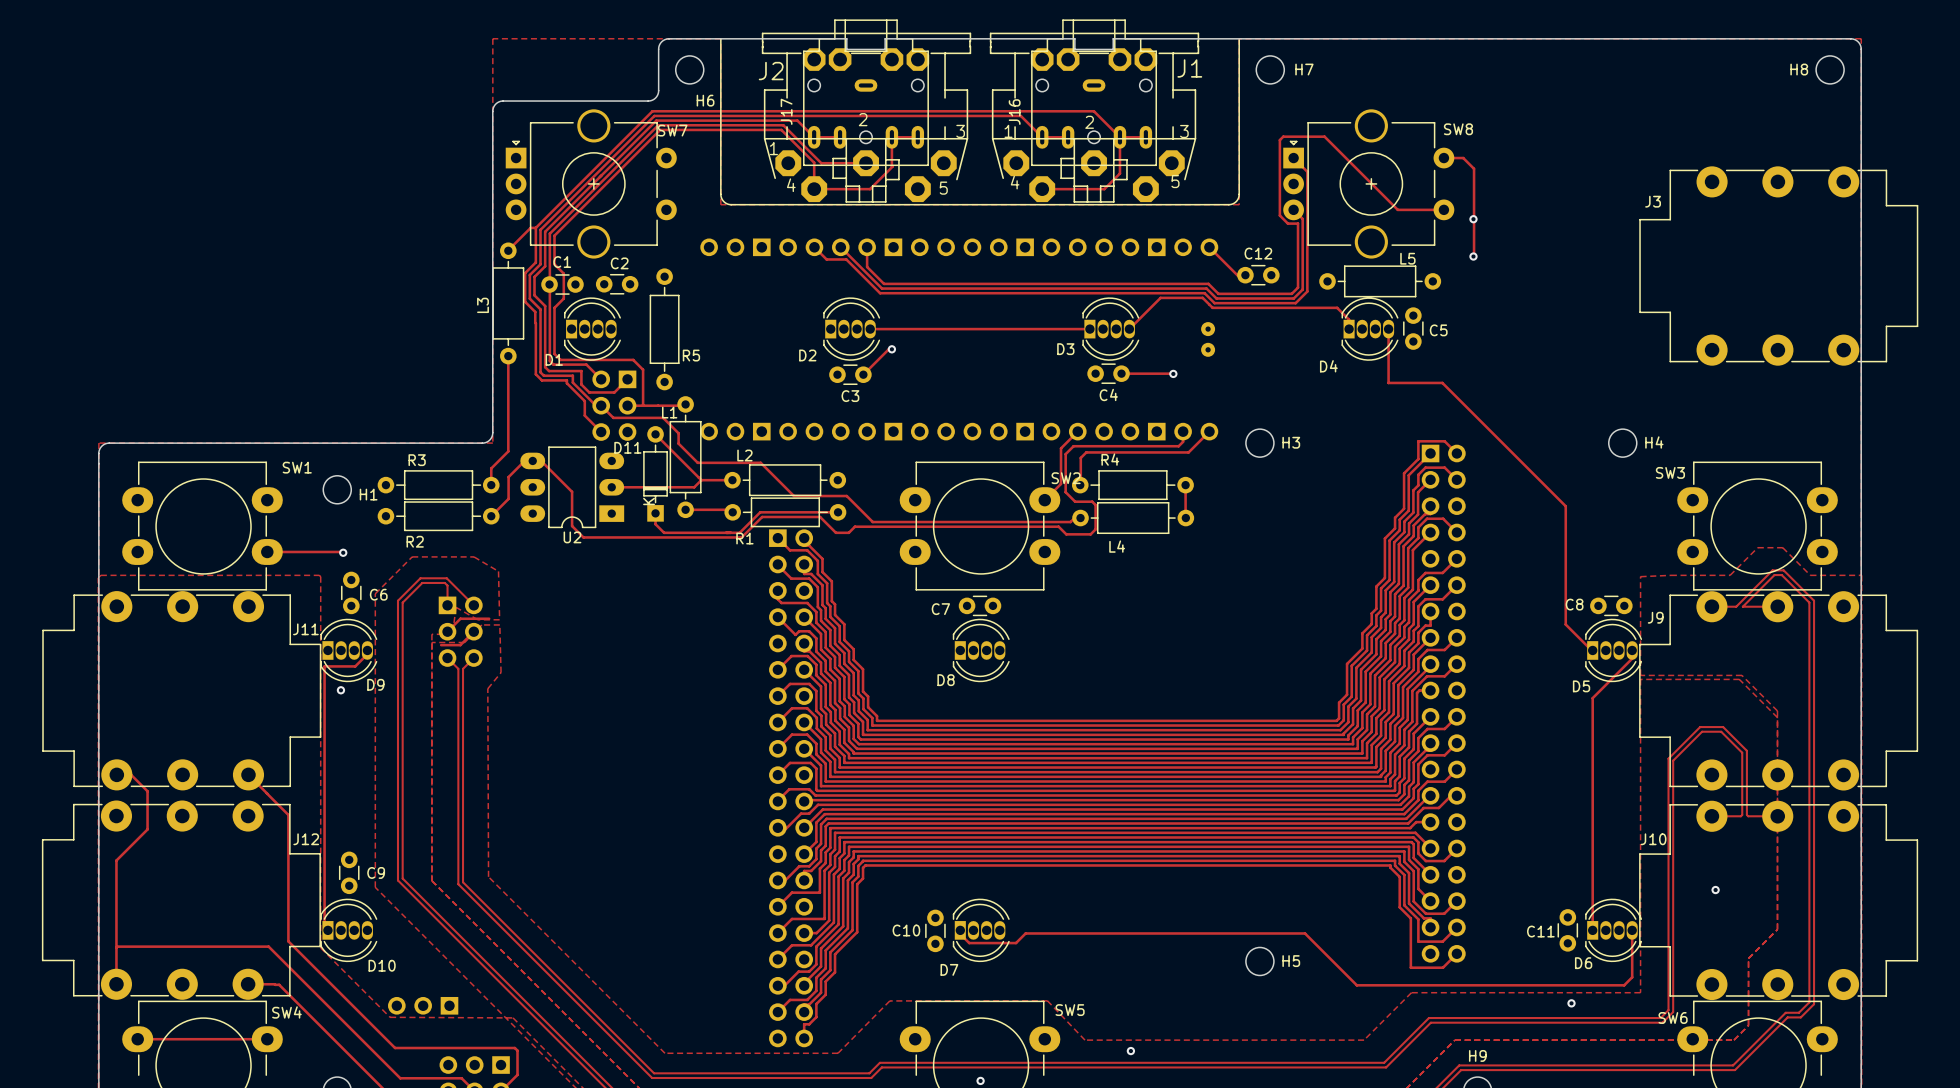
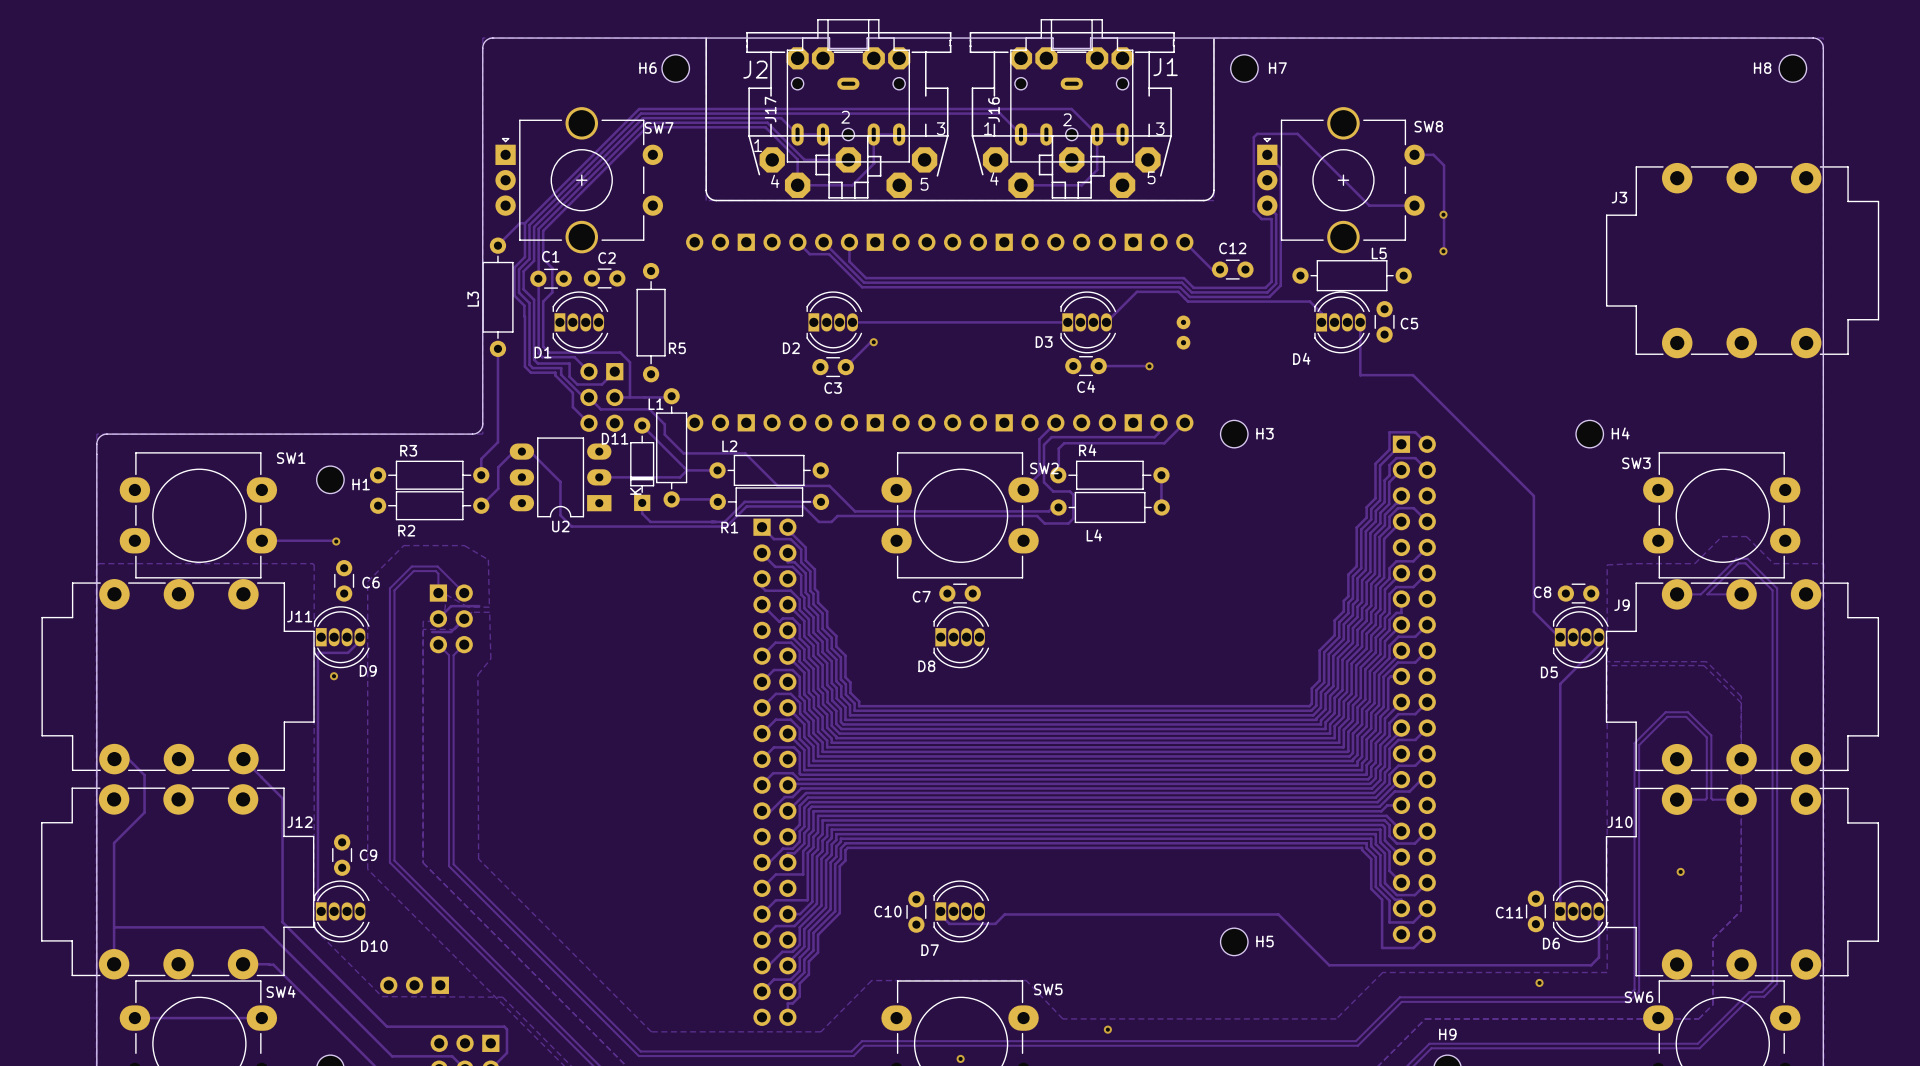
board edge: (669, 38) (662, 41) (658, 46) (658, 91) (656, 97) (651, 100) (501, 101) (495, 104) (492, 111) -> (655, 38) (489, 38) (484, 41) (482, 47) (482, 109)
H6 name position: H6 (705, 100) -> H6 (647, 68)

